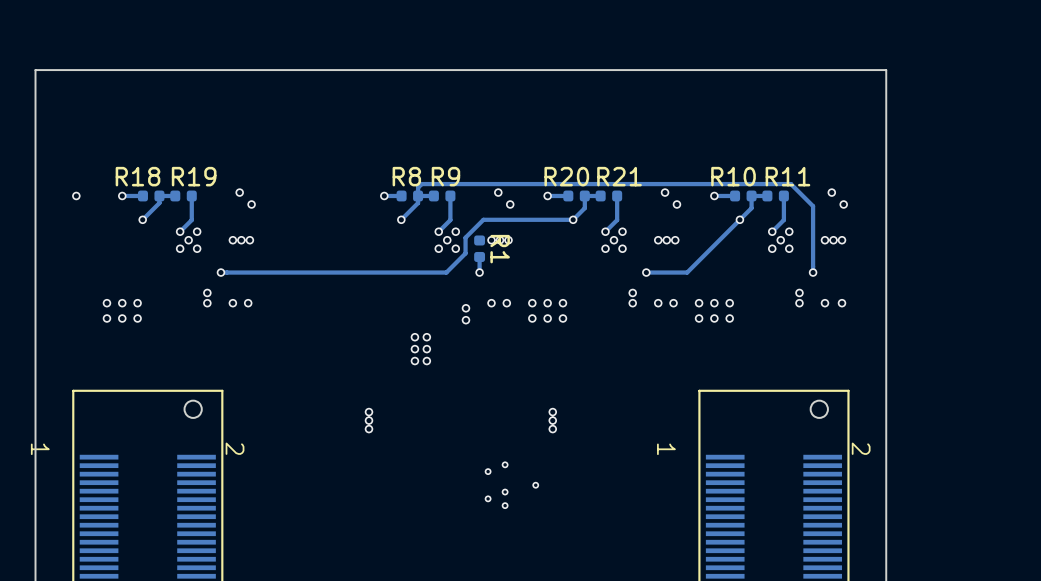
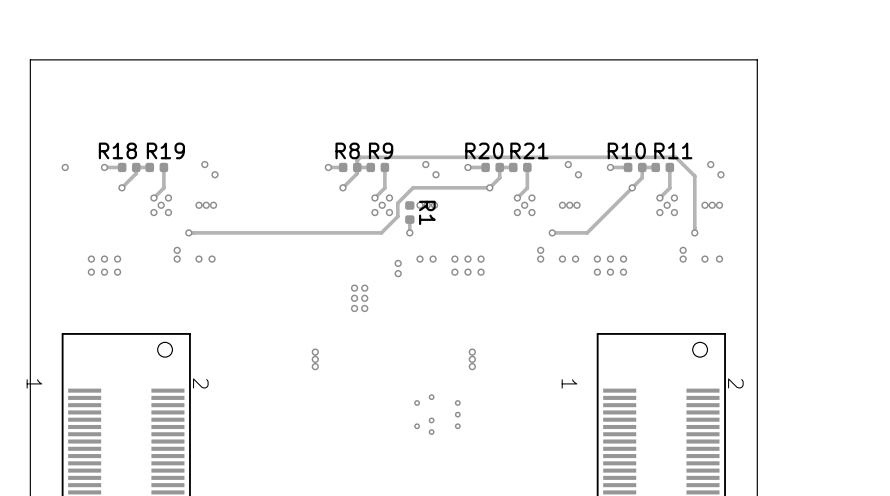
via: none -> (457, 403)
via: none -> (457, 426)

